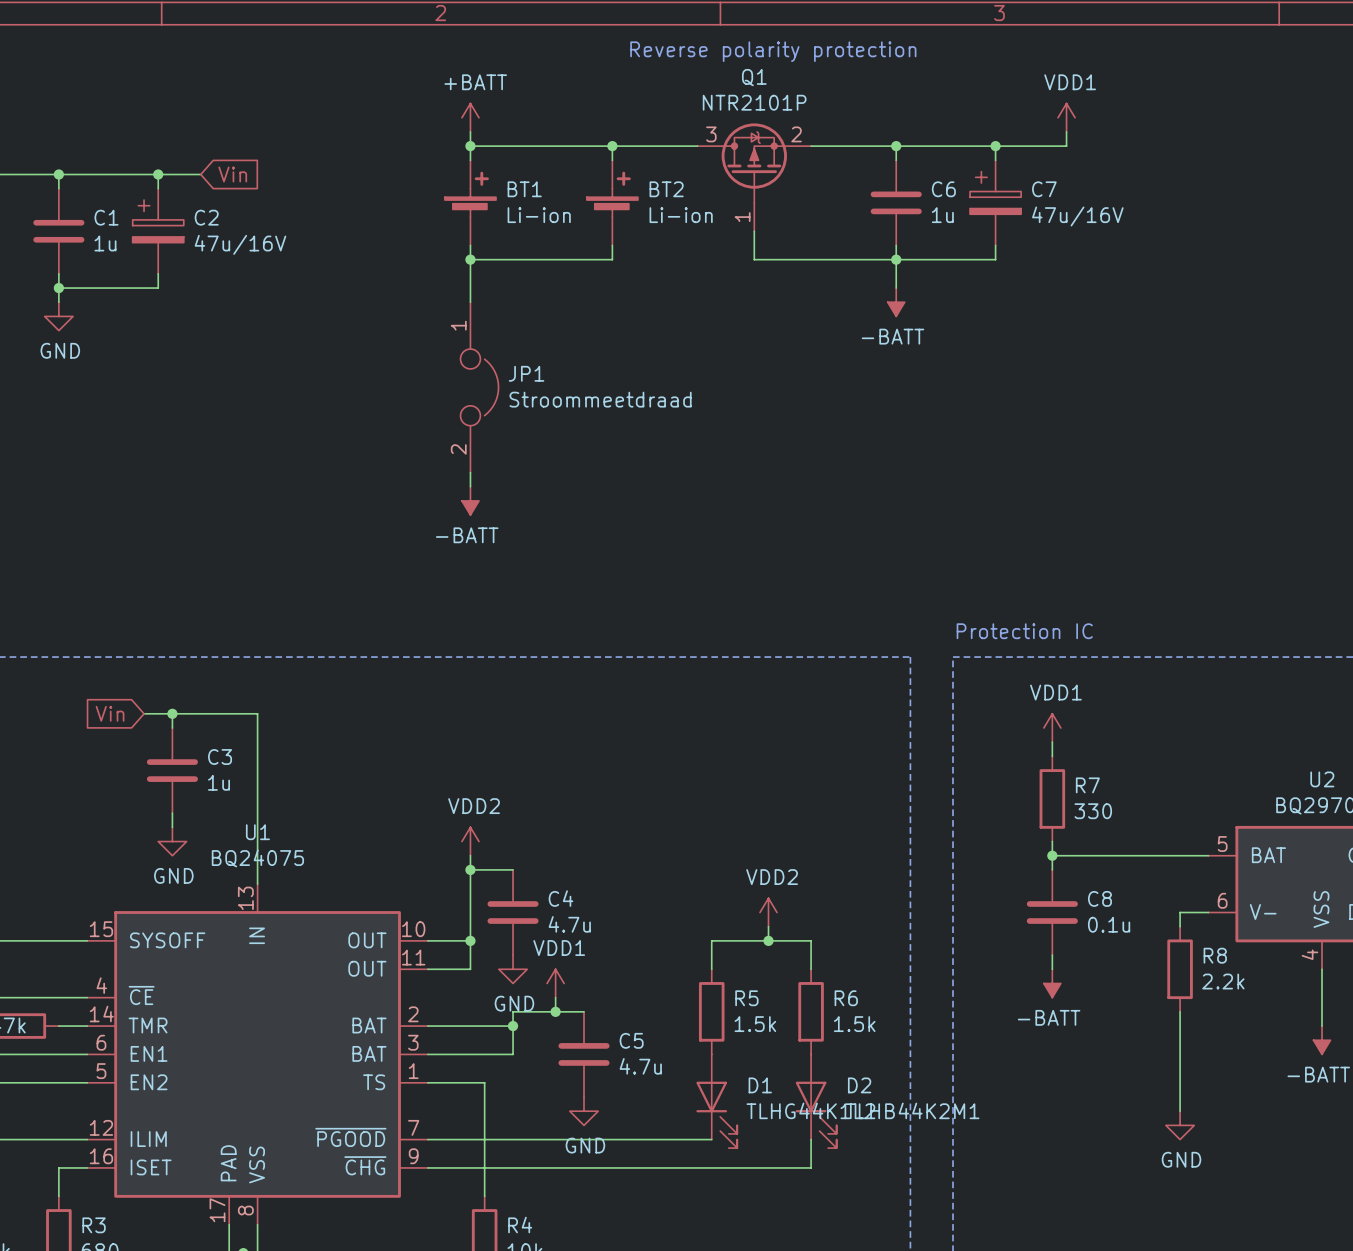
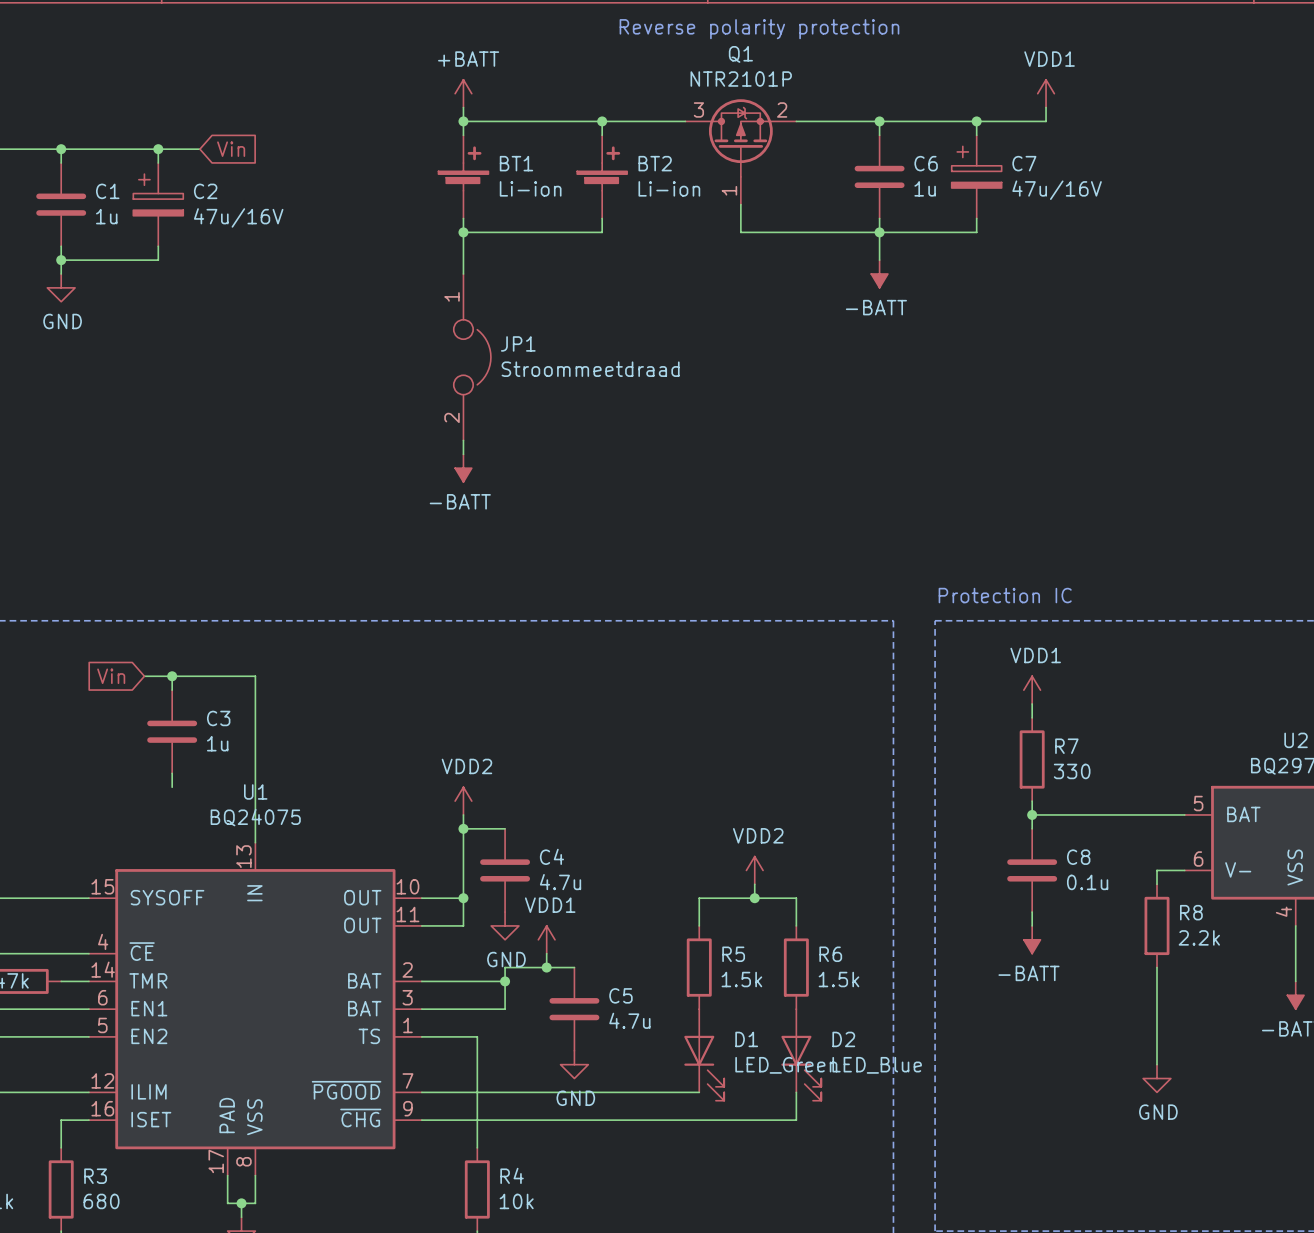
power symbol: GND (172, 841) -> none
D1 value: TLHG44K1L2 (810, 1110) -> LED_Green (786, 1065)
D2 value: TLHB44K2M1 (912, 1110) -> LED_Blue (877, 1065)

